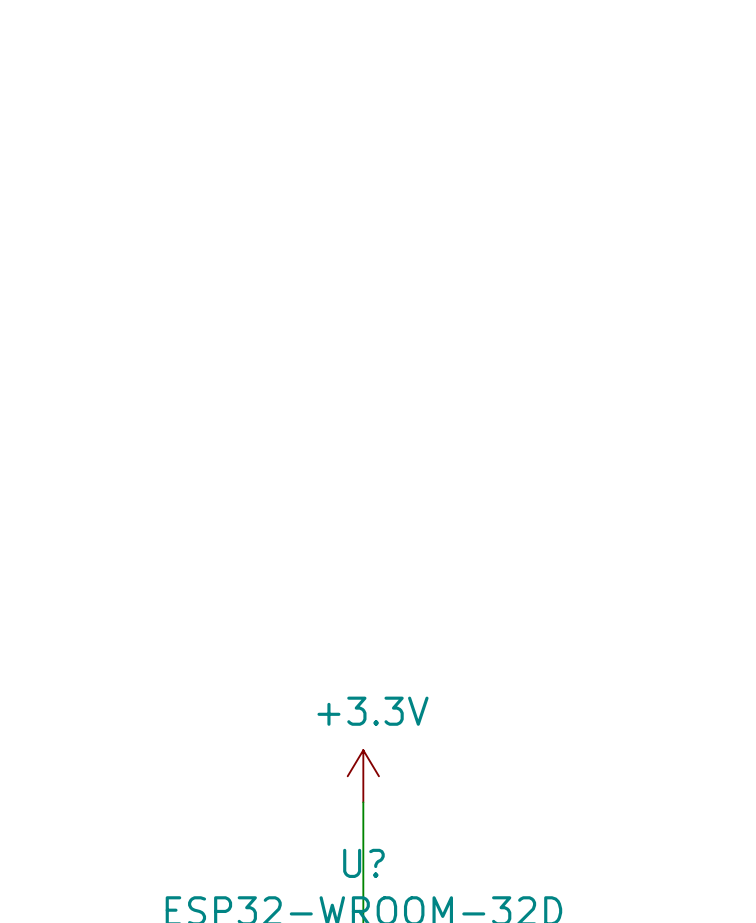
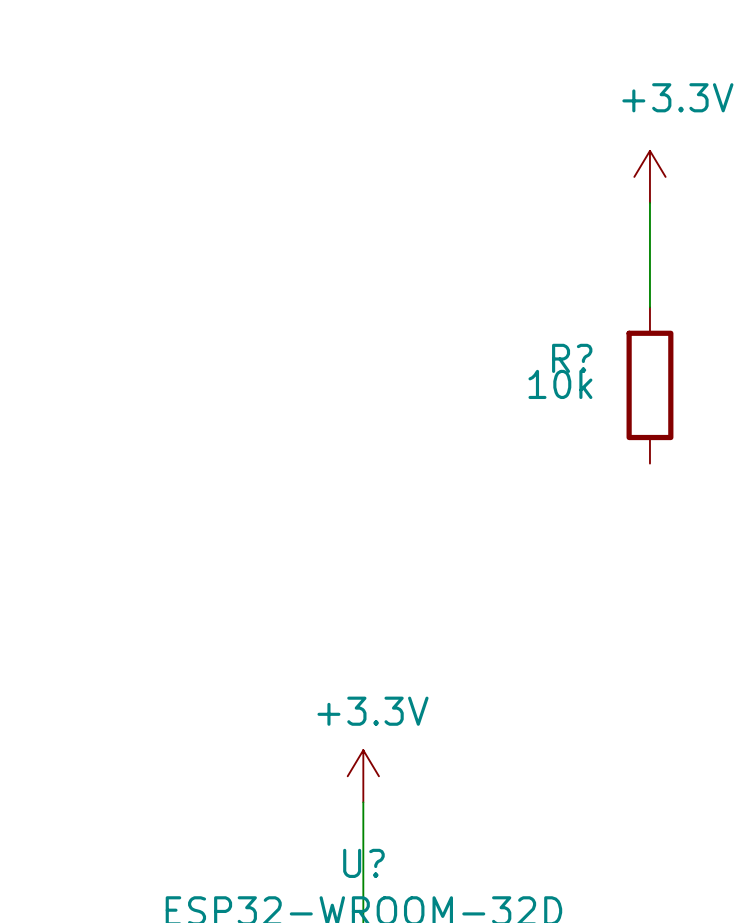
power symbol: none -> +3.3V (649, 176)
wire: none -> (649, 202) (649, 307)
R?: none -> 10k (649, 385)

